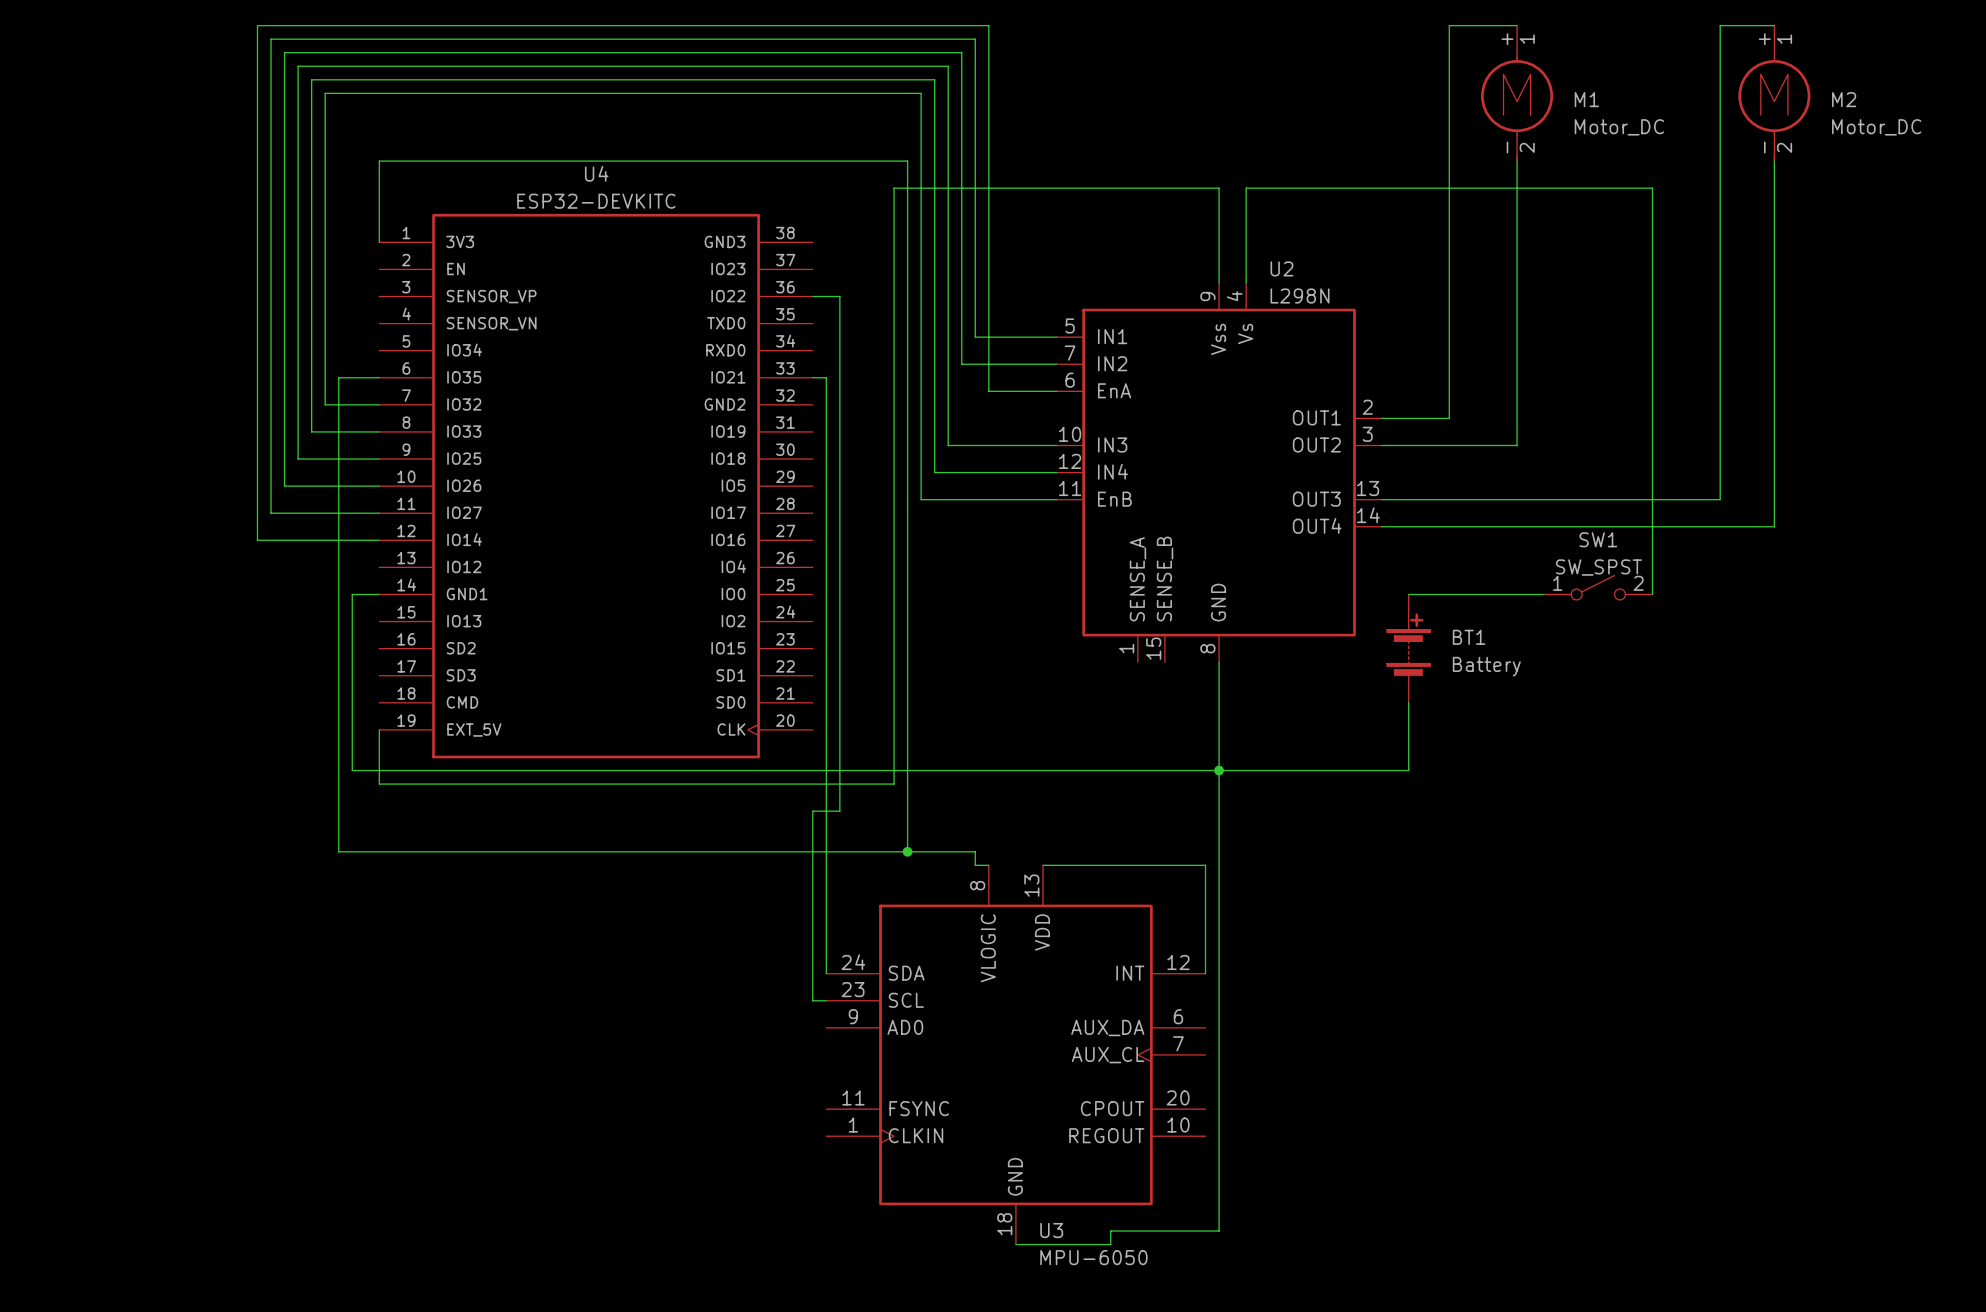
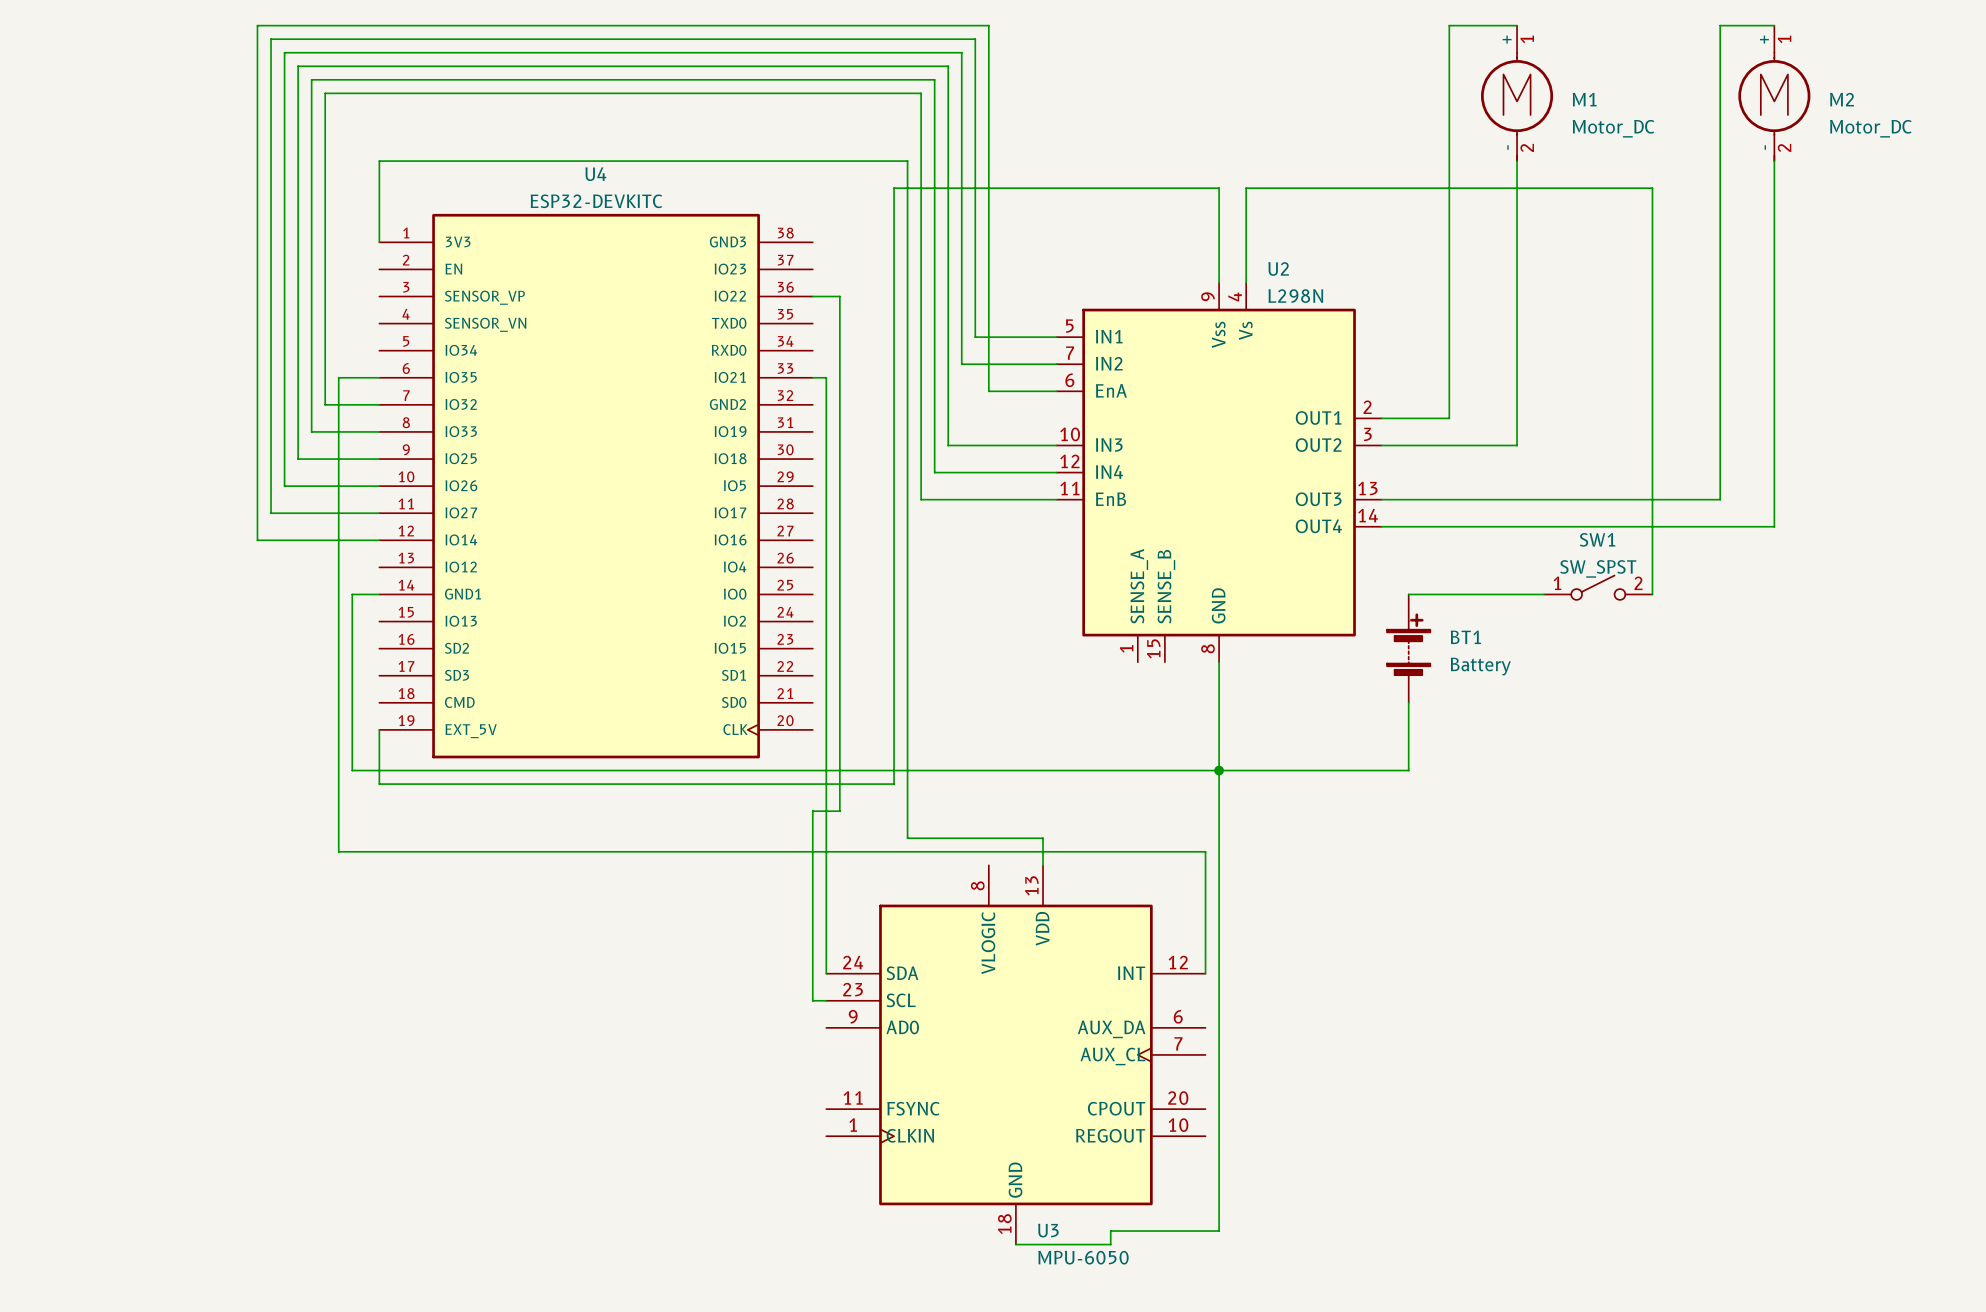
wire: (907, 838) (907, 851) -> (907, 838) (1043, 838) (1043, 865)
junction: (907, 851) -> none
wire: (975, 851) (975, 865) (988, 865) -> none
wire: (1043, 865) (1205, 865) -> (975, 851) (1205, 851) (1205, 865)

